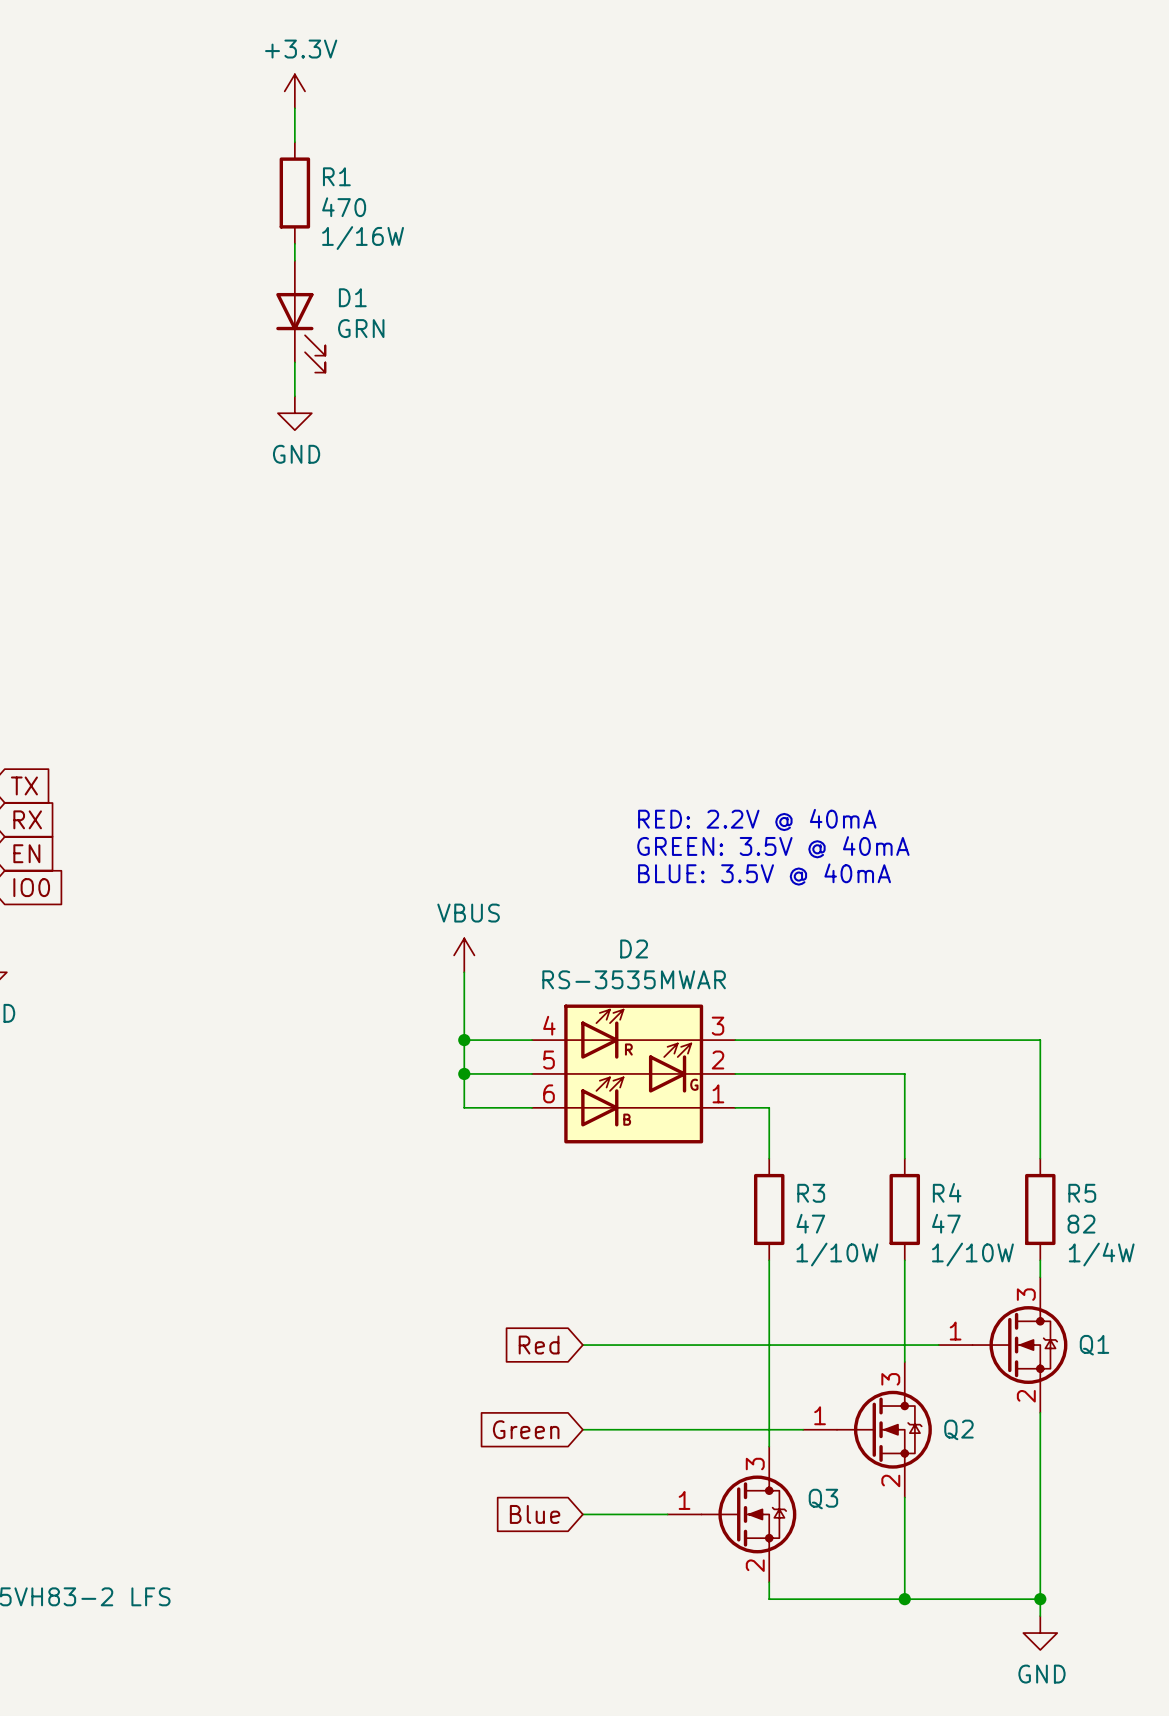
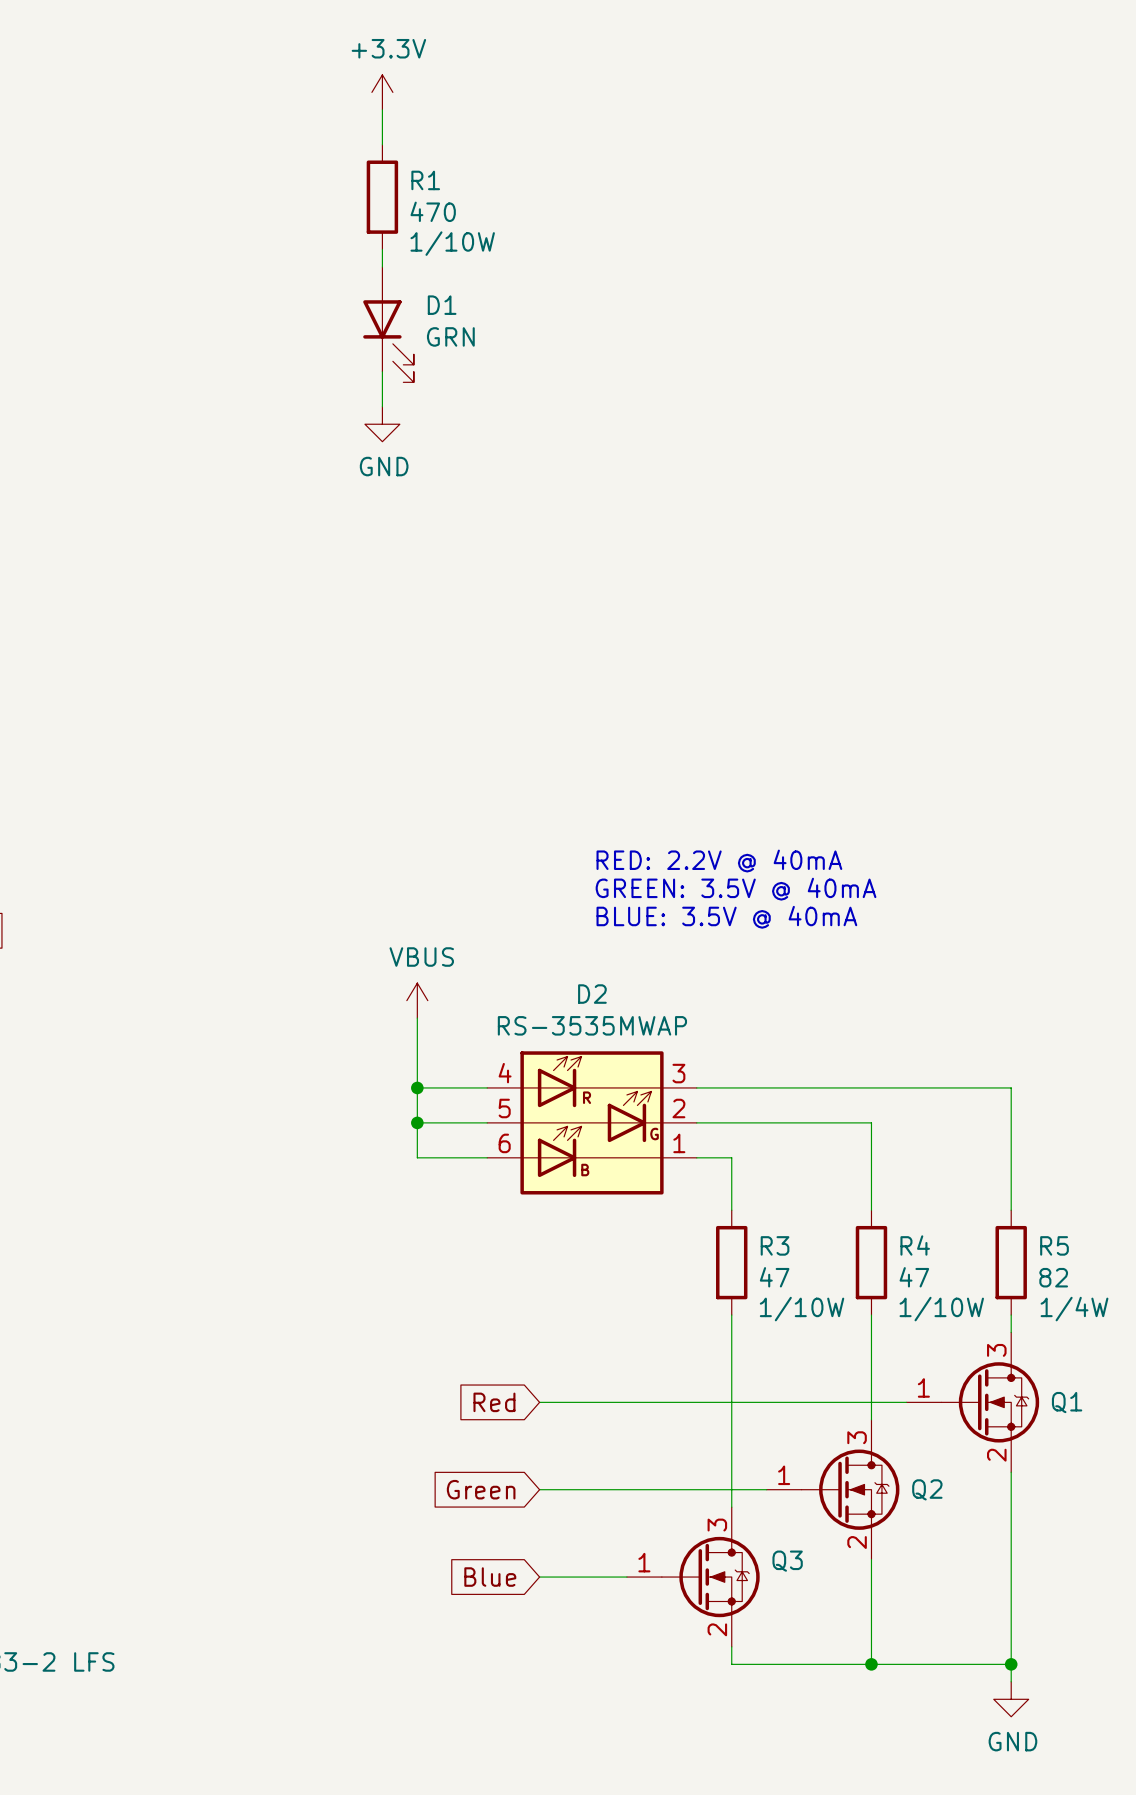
power symbol position: +3.3V (294, 91) -> +3.3V (382, 92)
wire: (294, 108) (294, 142) -> (382, 109) (382, 144)
R1 position: (294, 193) -> (382, 197)
R1 text: 1/16W (363, 238) -> 1/10W (452, 243)
wire: (294, 243) (294, 260) -> (382, 249) (382, 267)
D1 position: (300, 316) -> (388, 324)
wire: (294, 362) (294, 396) -> (382, 371) (382, 406)
power symbol position: GND (294, 413) -> GND (382, 424)
D2 value: RS-3535MWAR (634, 979) -> RS-3535MWAP (592, 1025)

